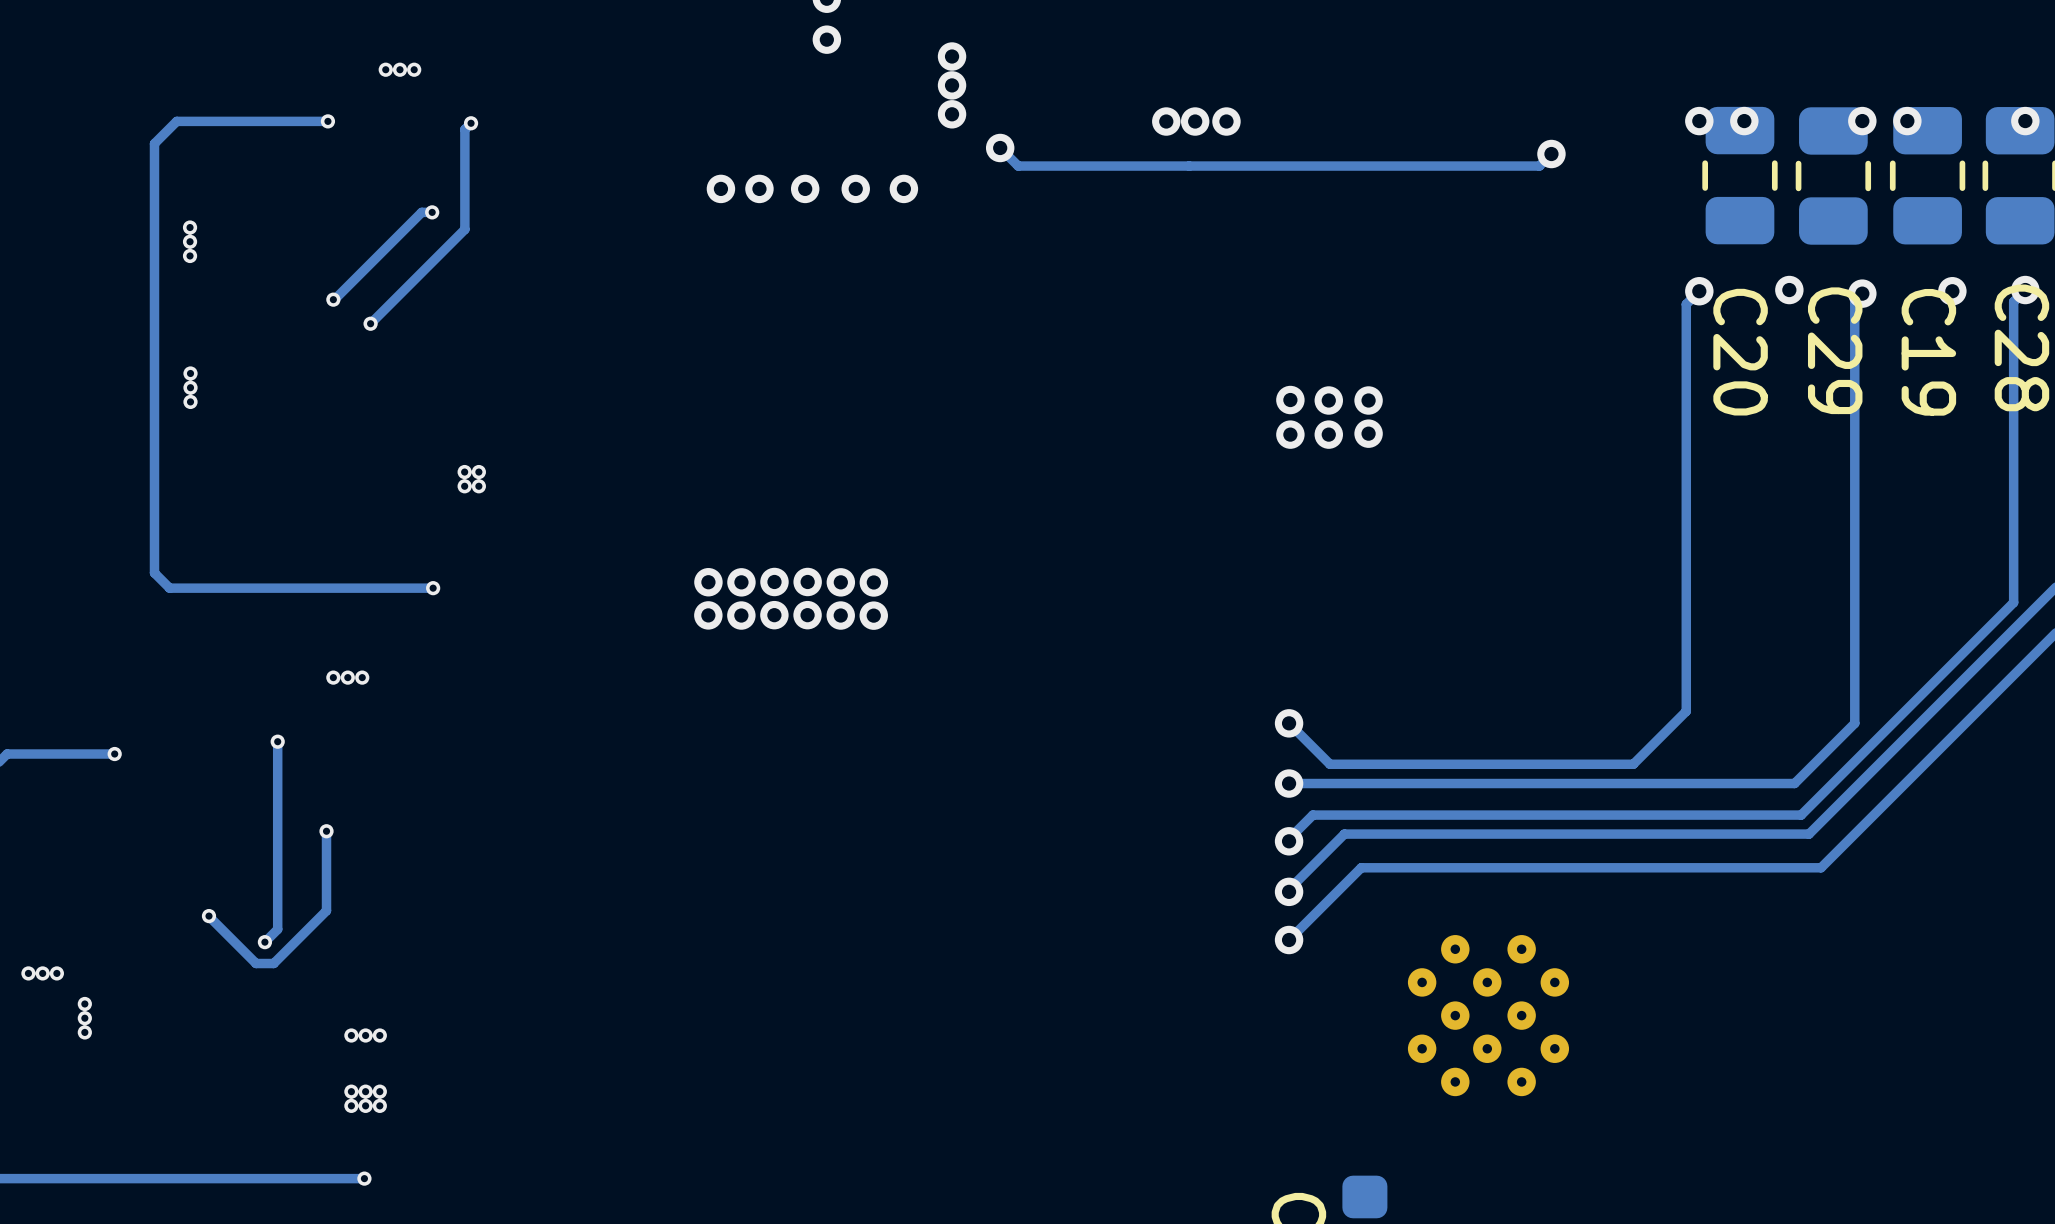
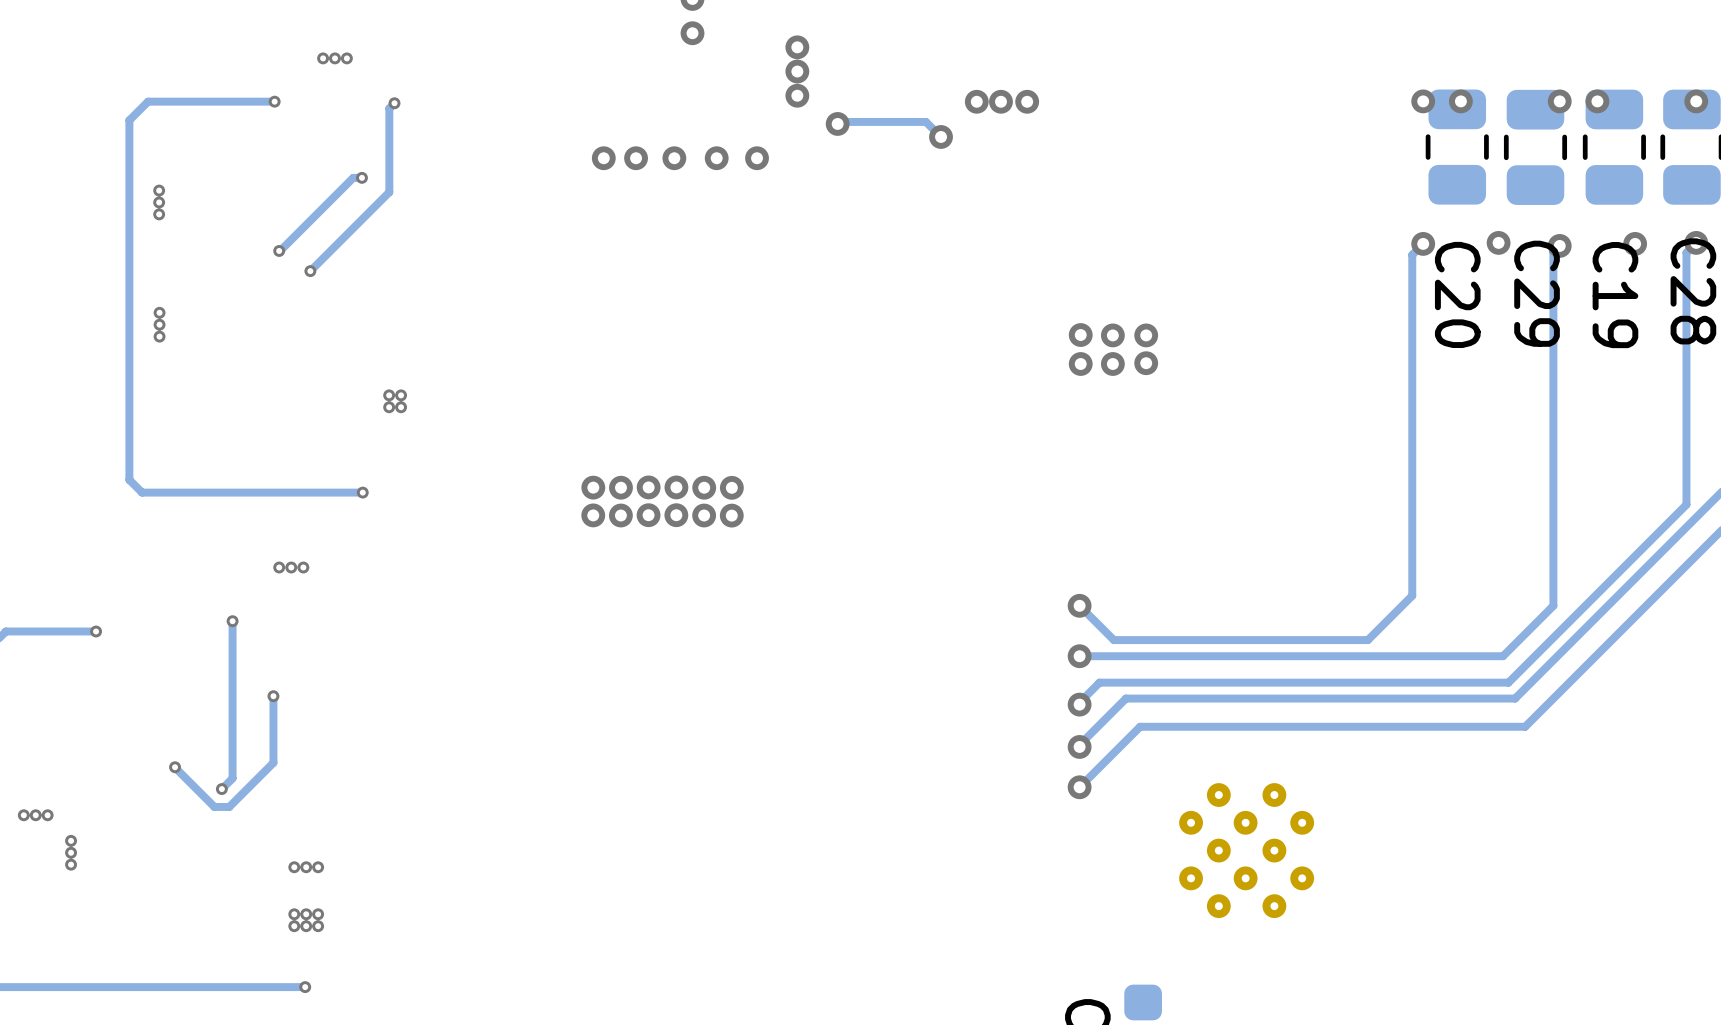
track: none -> (839, 121) (925, 121) (941, 136)
track: (1000, 148) (1018, 166) (1539, 166) (1551, 154) -> none
via: (1551, 154) -> none
via: none -> (941, 136)

